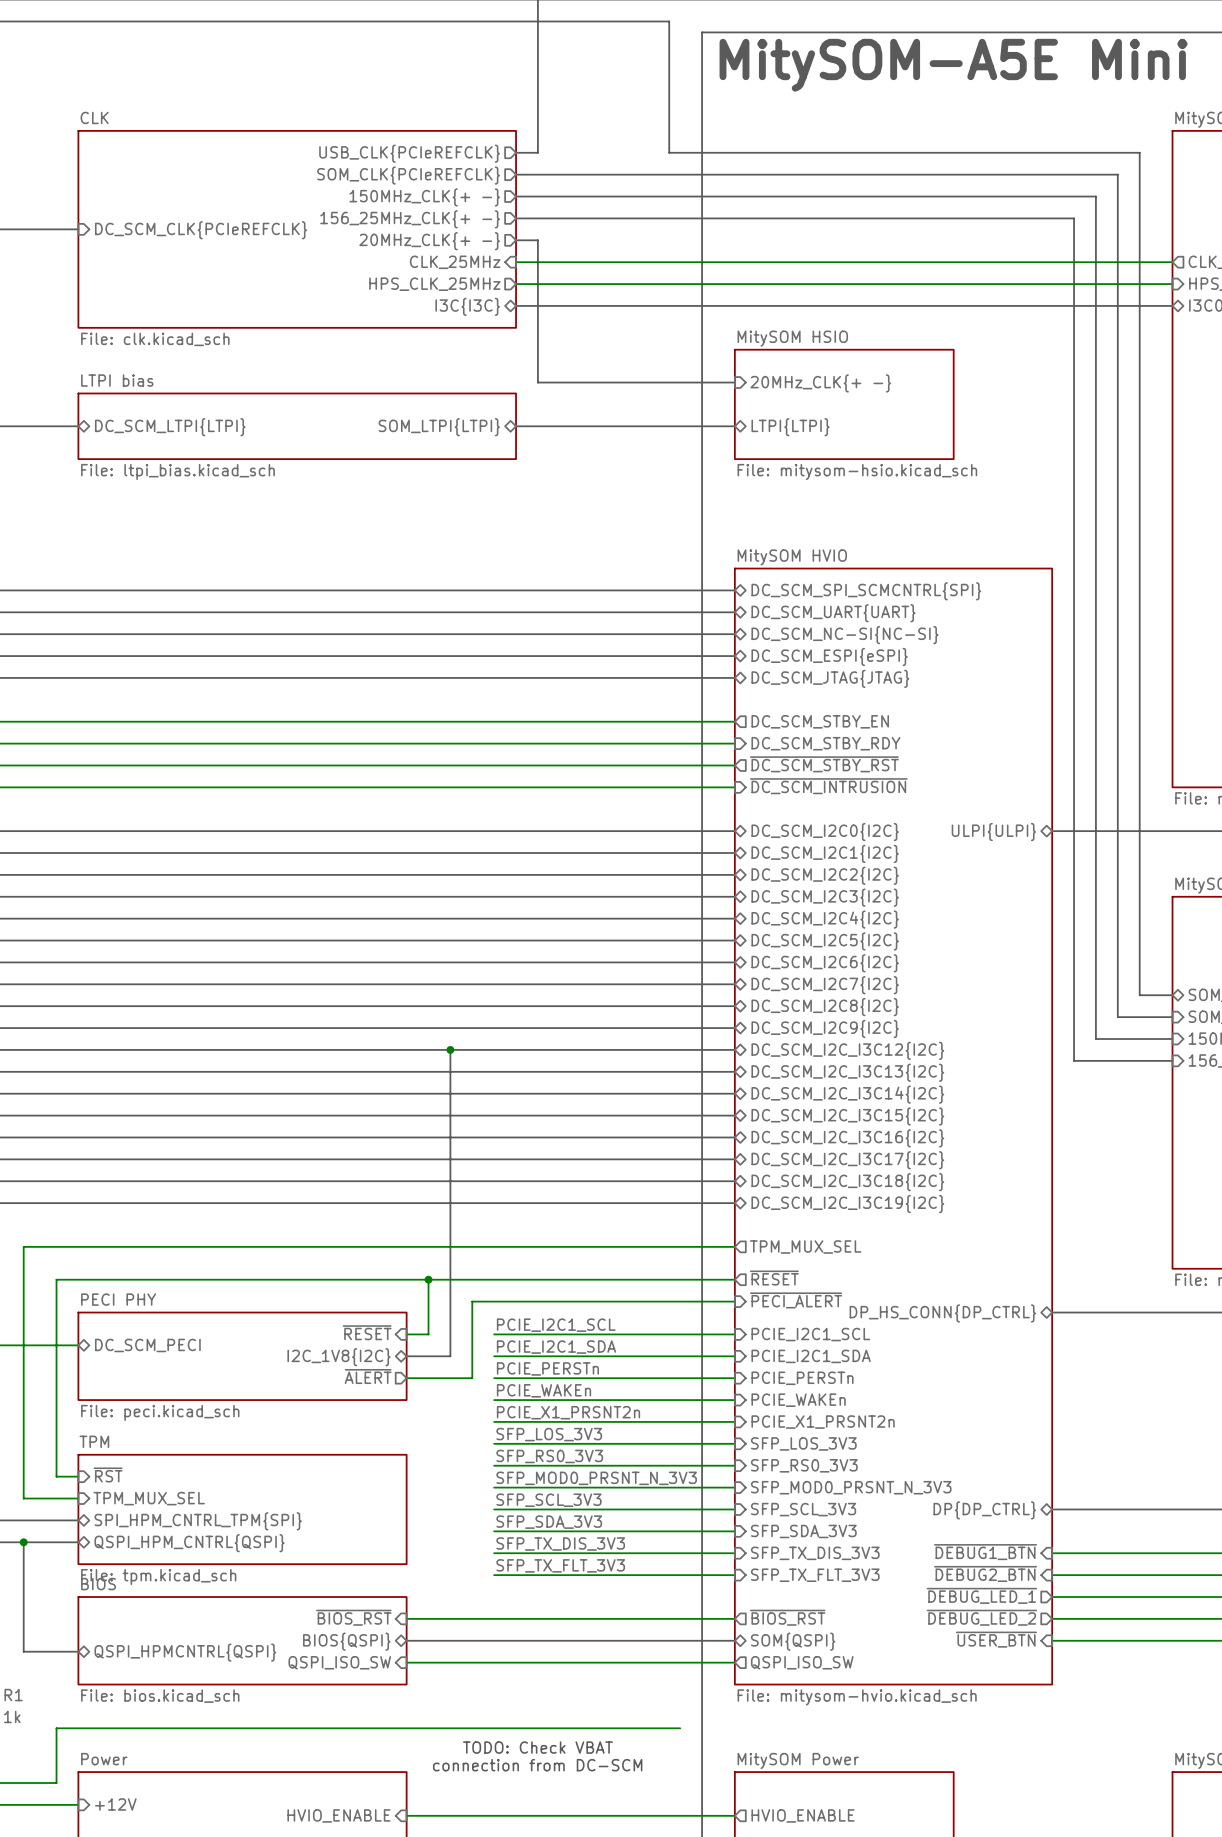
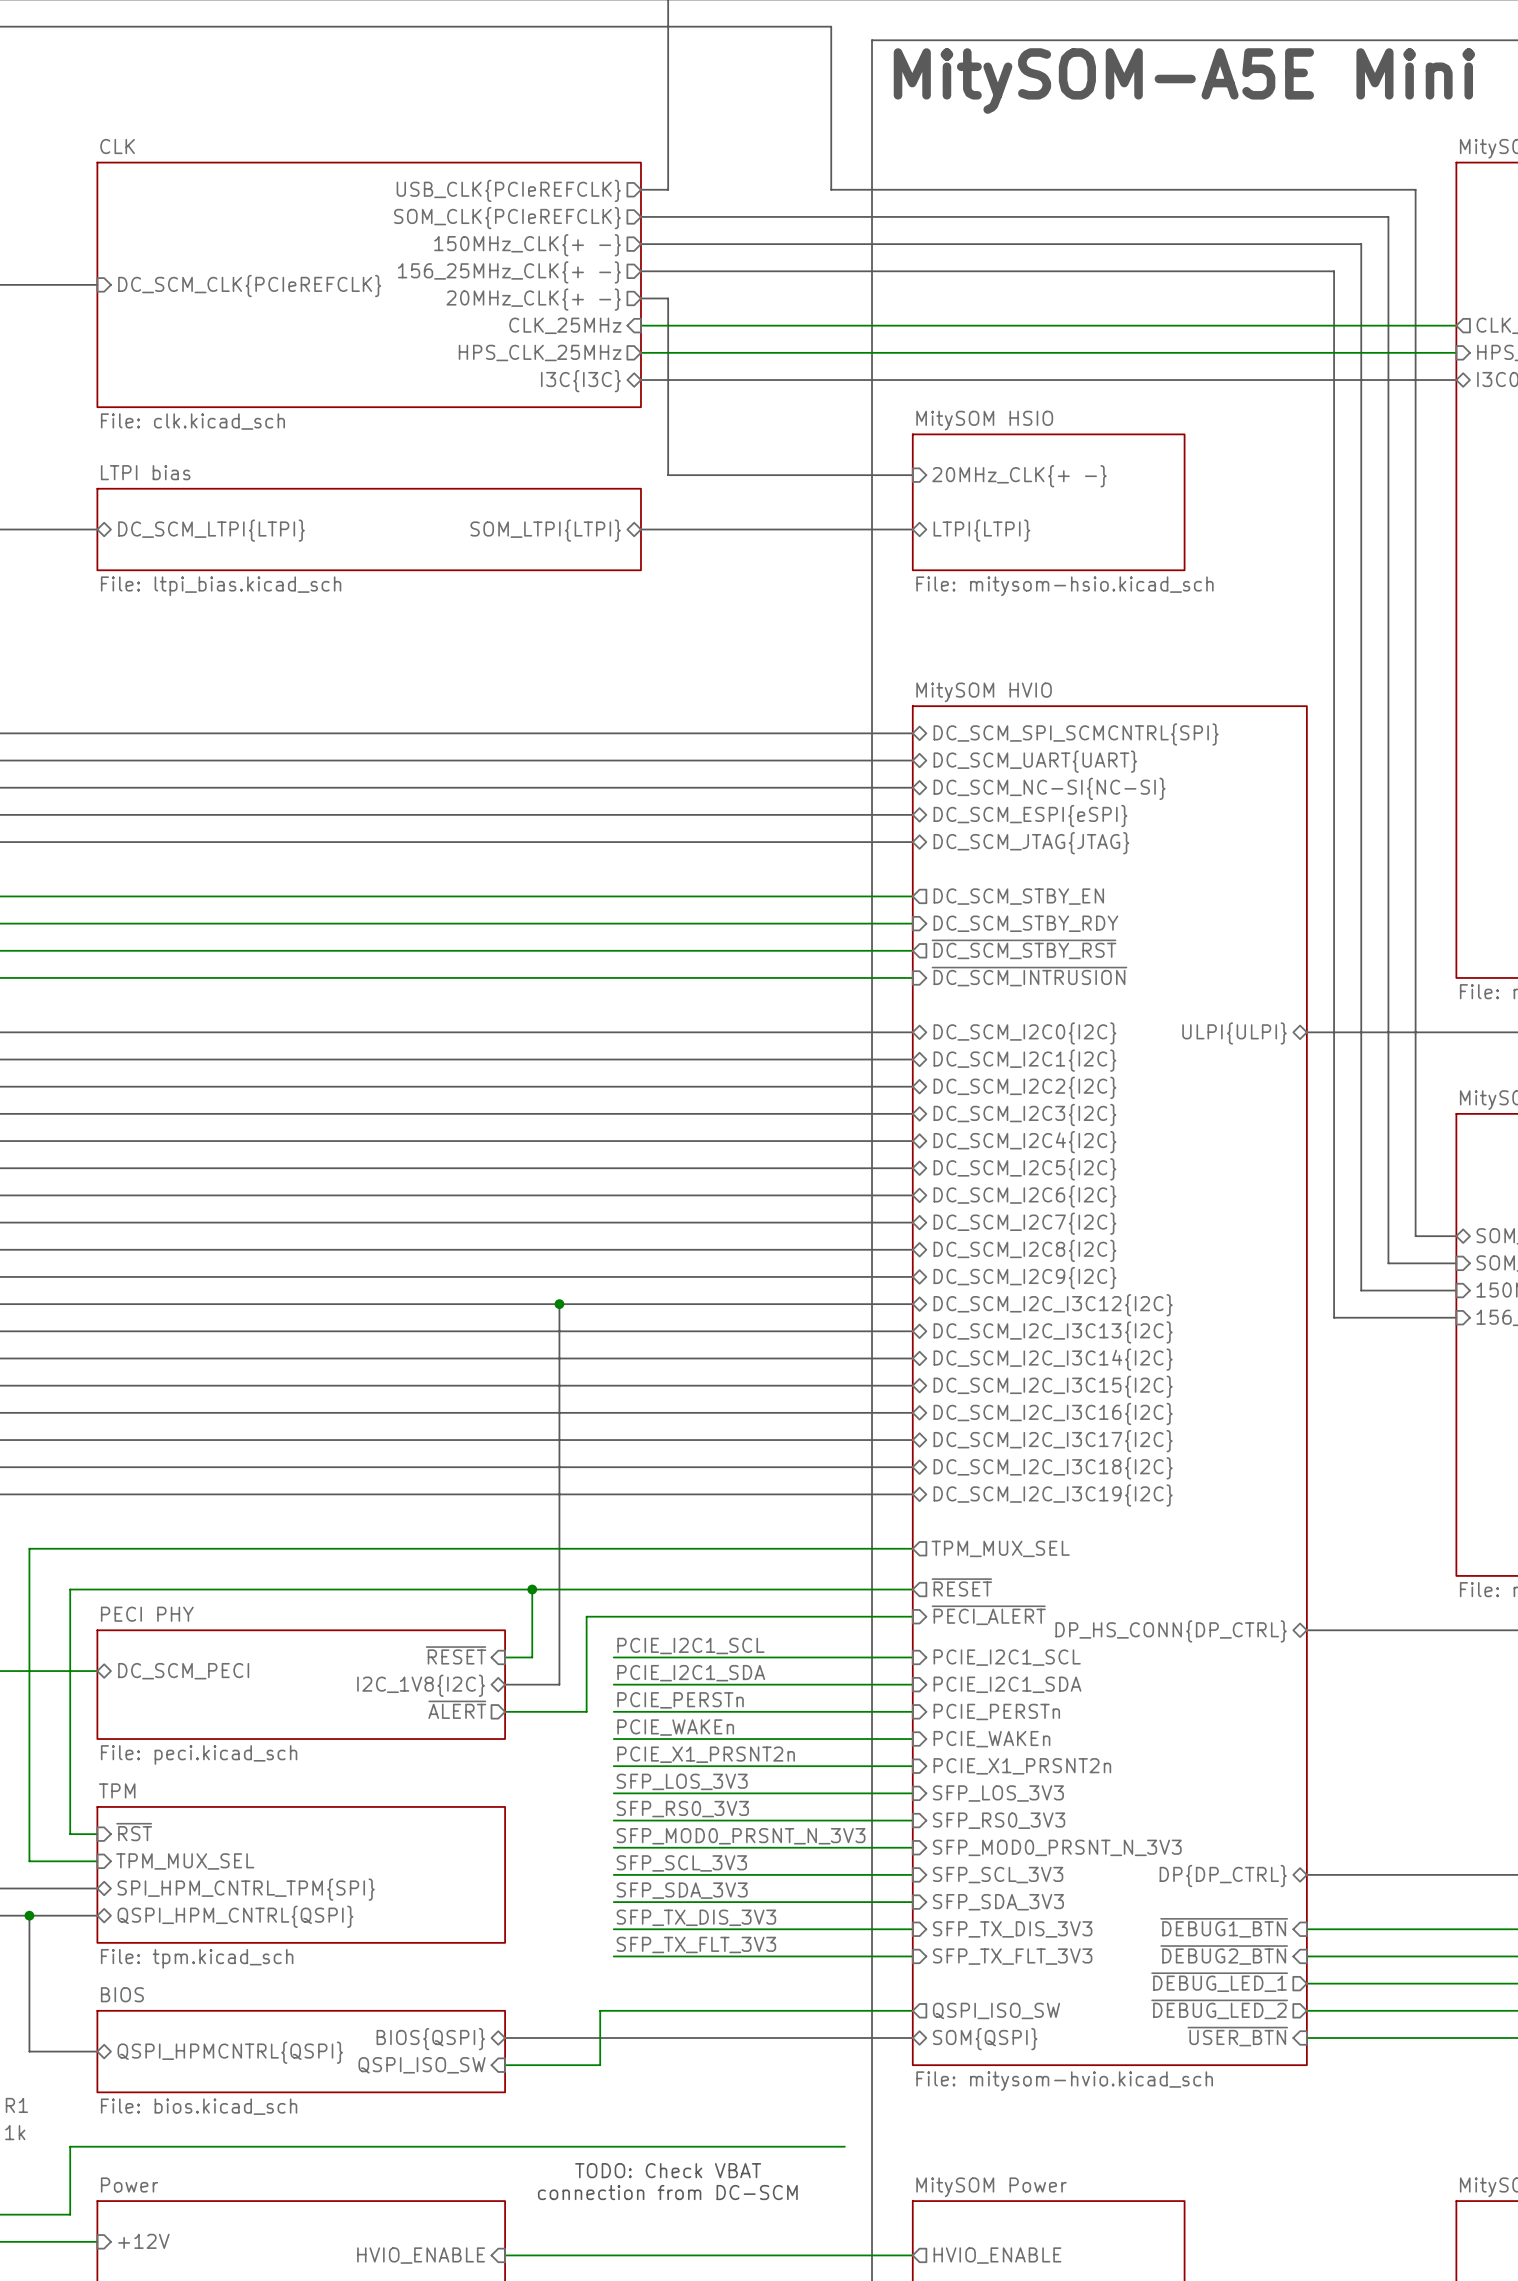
sheet MitySOM HVIO: none -> File: mitysom-hvio.kicad_sch (1109, 1385)
sheet MitySOM HVIO: File: mitysom-hvio.kicad_sch (893, 1126) -> none
sheet pin: ~{BIOS_RST} (353, 1617) -> none
sheet pin: ~{BIOS_RST} (787, 1617) -> QSPI_ISO_SW (996, 2010)
wire: (406, 1618) (483, 1618) -> (600, 2065) (600, 2010)
sheet BIOS: File: bios.kicad_sch (242, 1640) -> none
sheet BIOS: none -> File: bios.kicad_sch (301, 2051)
wire: (483, 1662) (734, 1662) -> none
sheet pin: QSPI_ISO_SW (802, 1662) -> none

